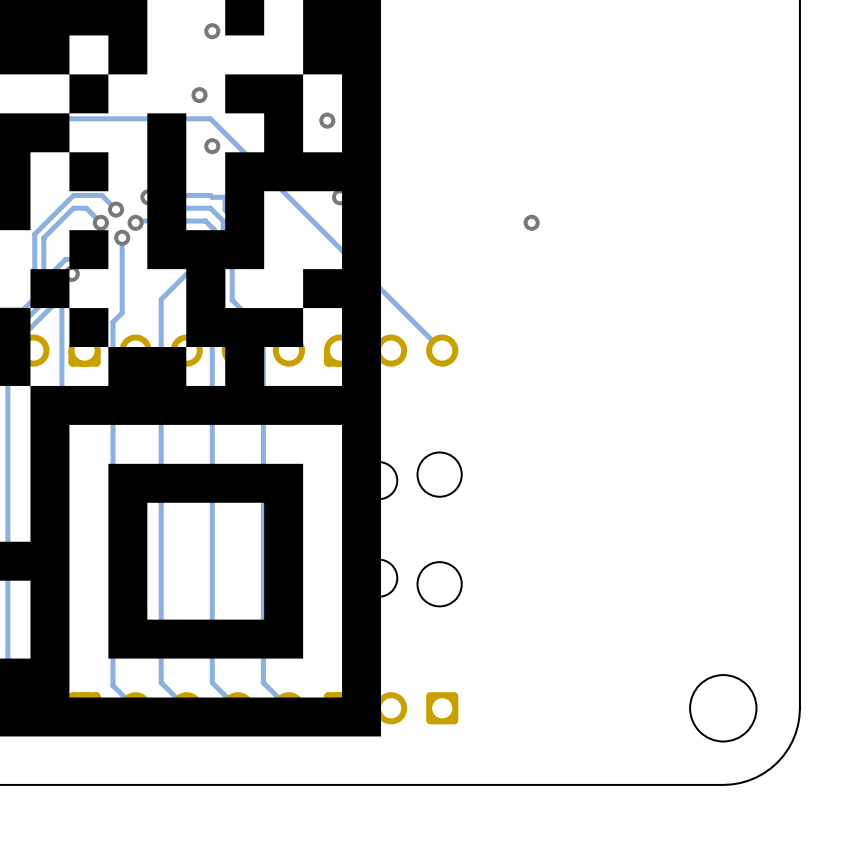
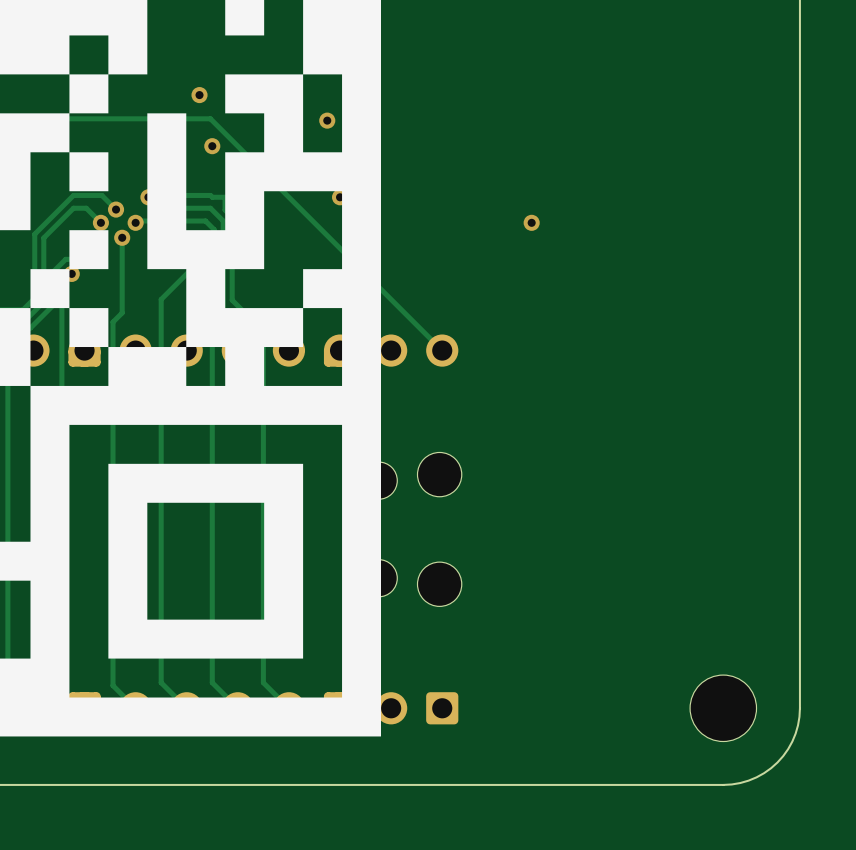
via: (212, 31) -> none

